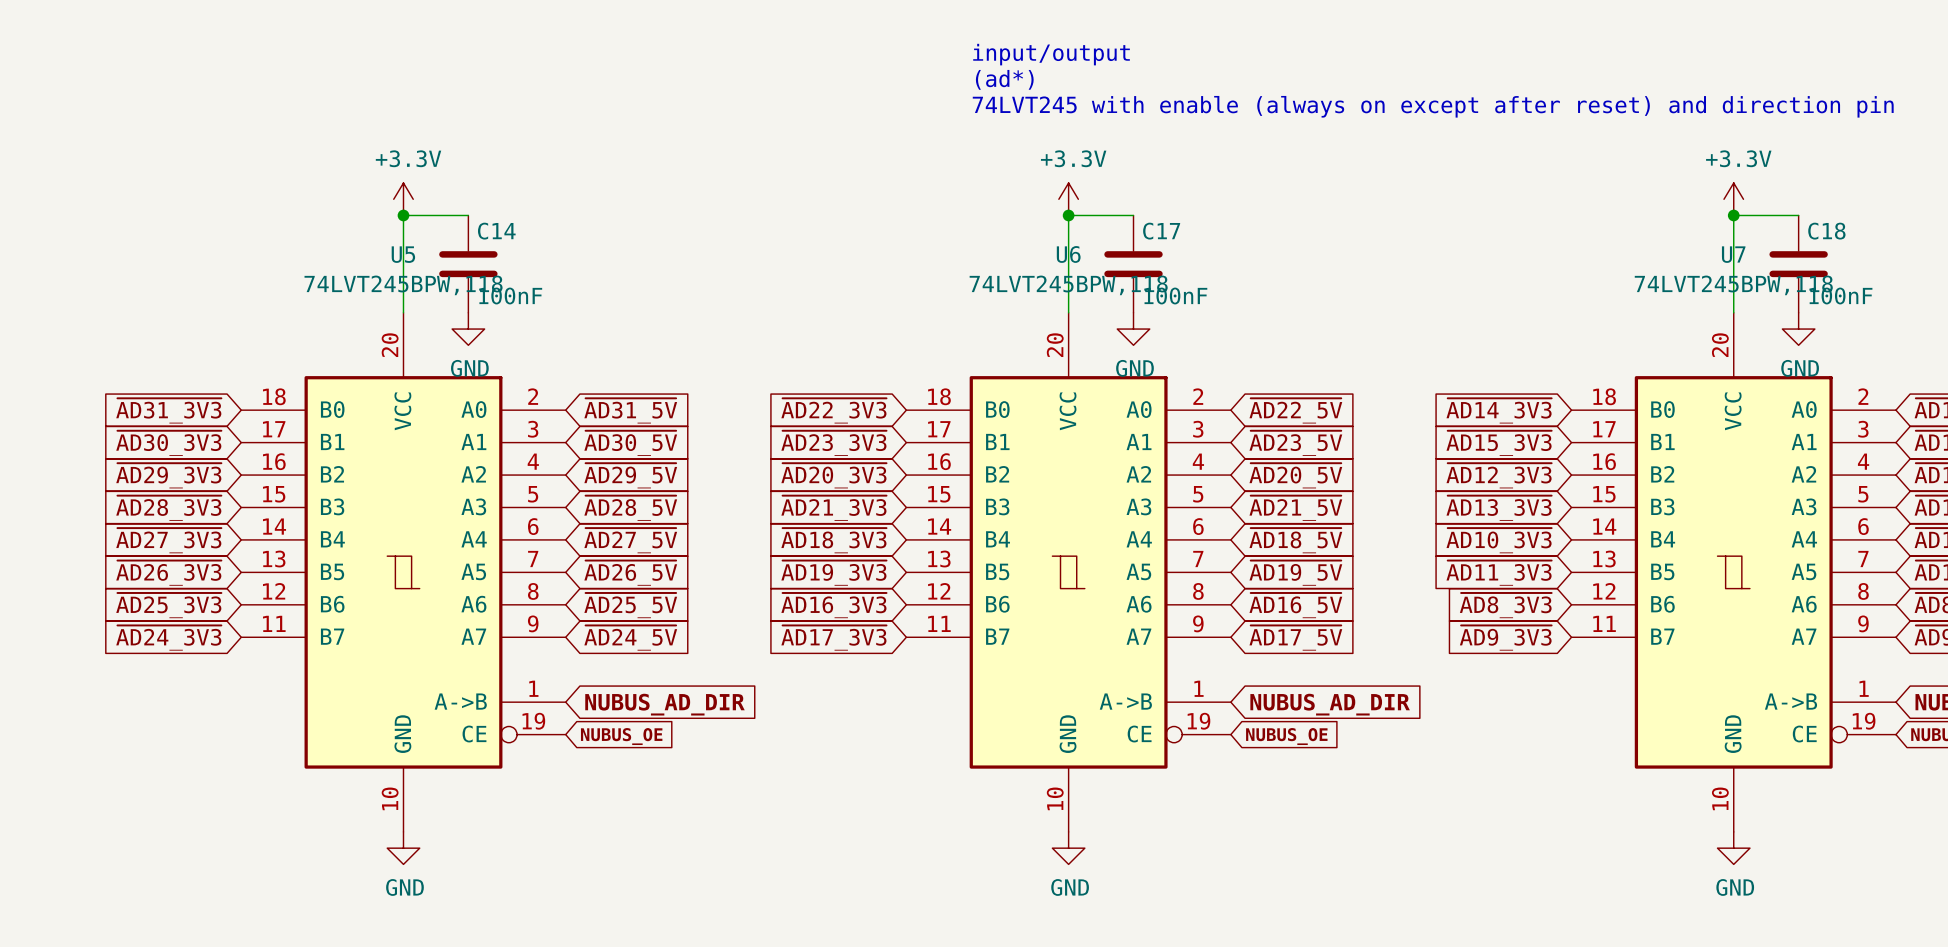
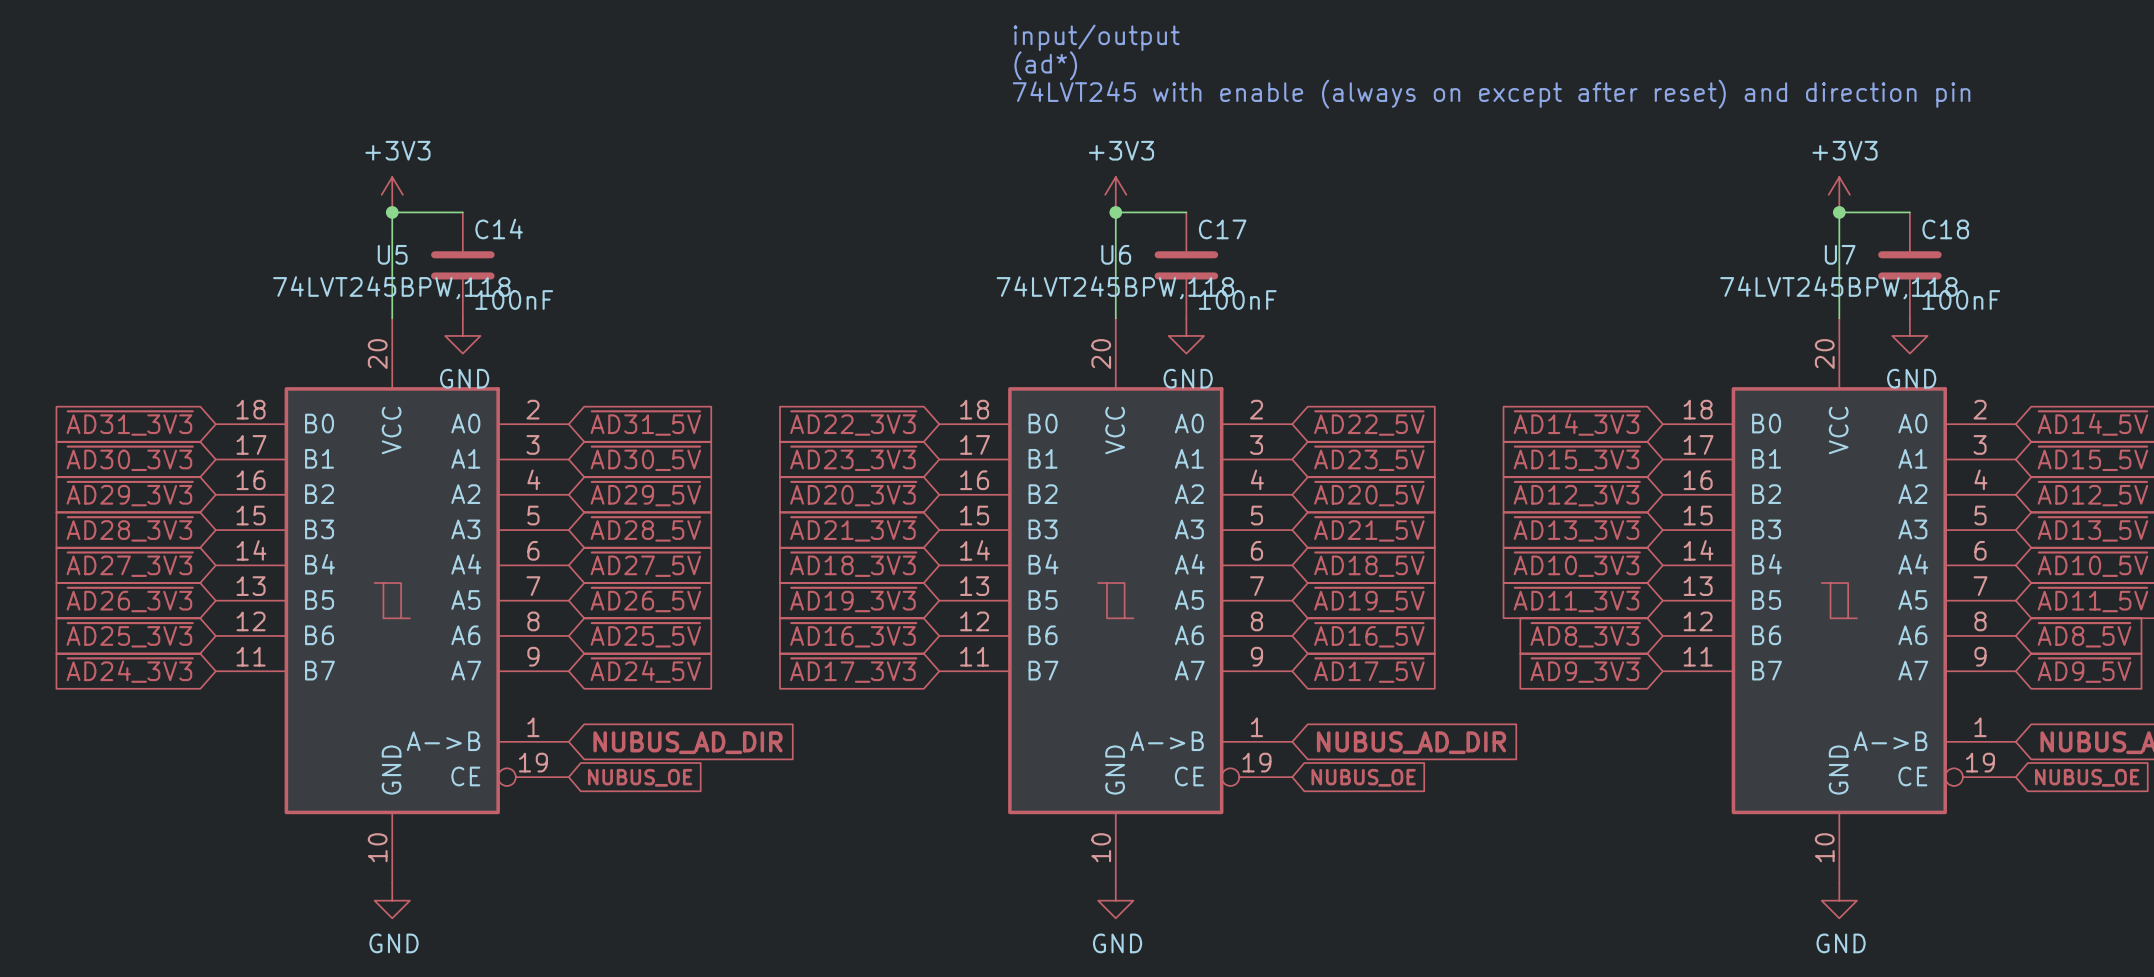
power symbol: +3.3V (403, 199) -> +3V3 (392, 194)
power symbol: +3.3V (1068, 199) -> +3V3 (1115, 194)
power symbol: +3.3V (1733, 199) -> +3V3 (1839, 194)

